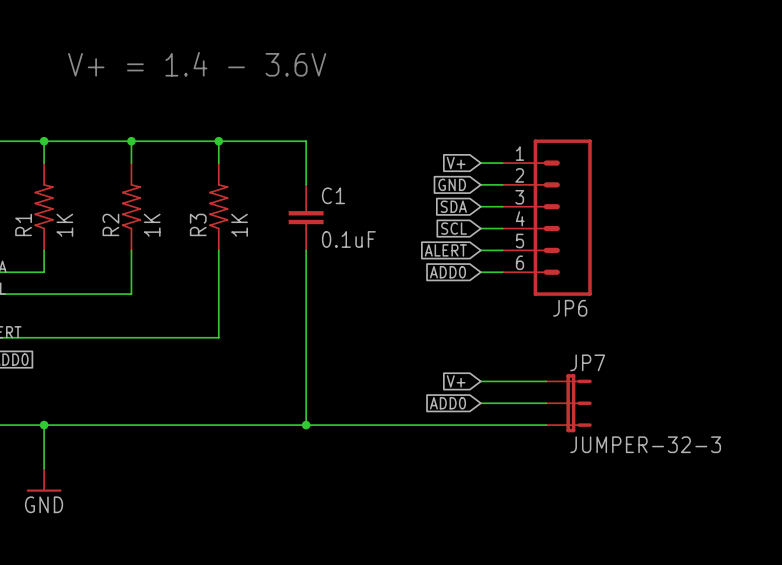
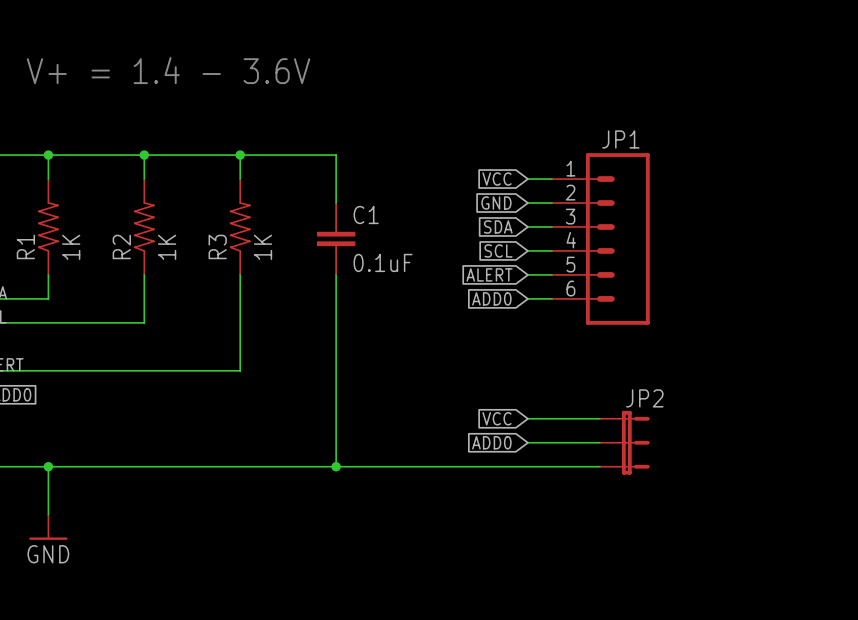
text position: V+ = 1.4 - 3.6V (197, 64) -> V+ = 1.4 - 3.6V (168, 70)
global label: V+ (456, 163) -> VCC (496, 179)
JP6 name: JP6 (570, 308) -> JP1 (620, 139)
JP7 name: JP7 (587, 362) -> JP2 (644, 398)
global label: V+ (456, 381) -> VCC (496, 418)
JP7 value: JUMPER-32-3 (645, 444) -> none

